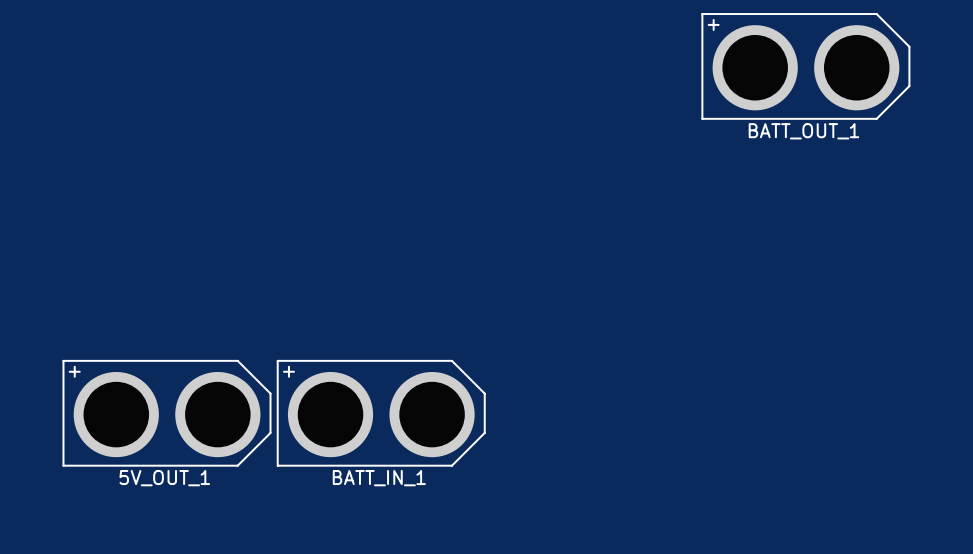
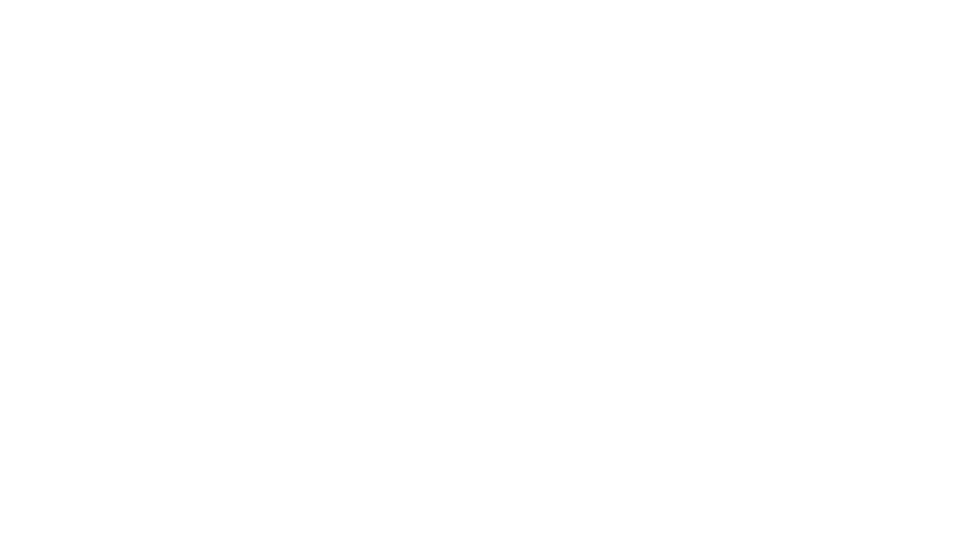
BATT_OUT_1: (805, 66) -> none
5V_OUT_1: (166, 413) -> none
BATT_IN_1: (381, 413) -> none

